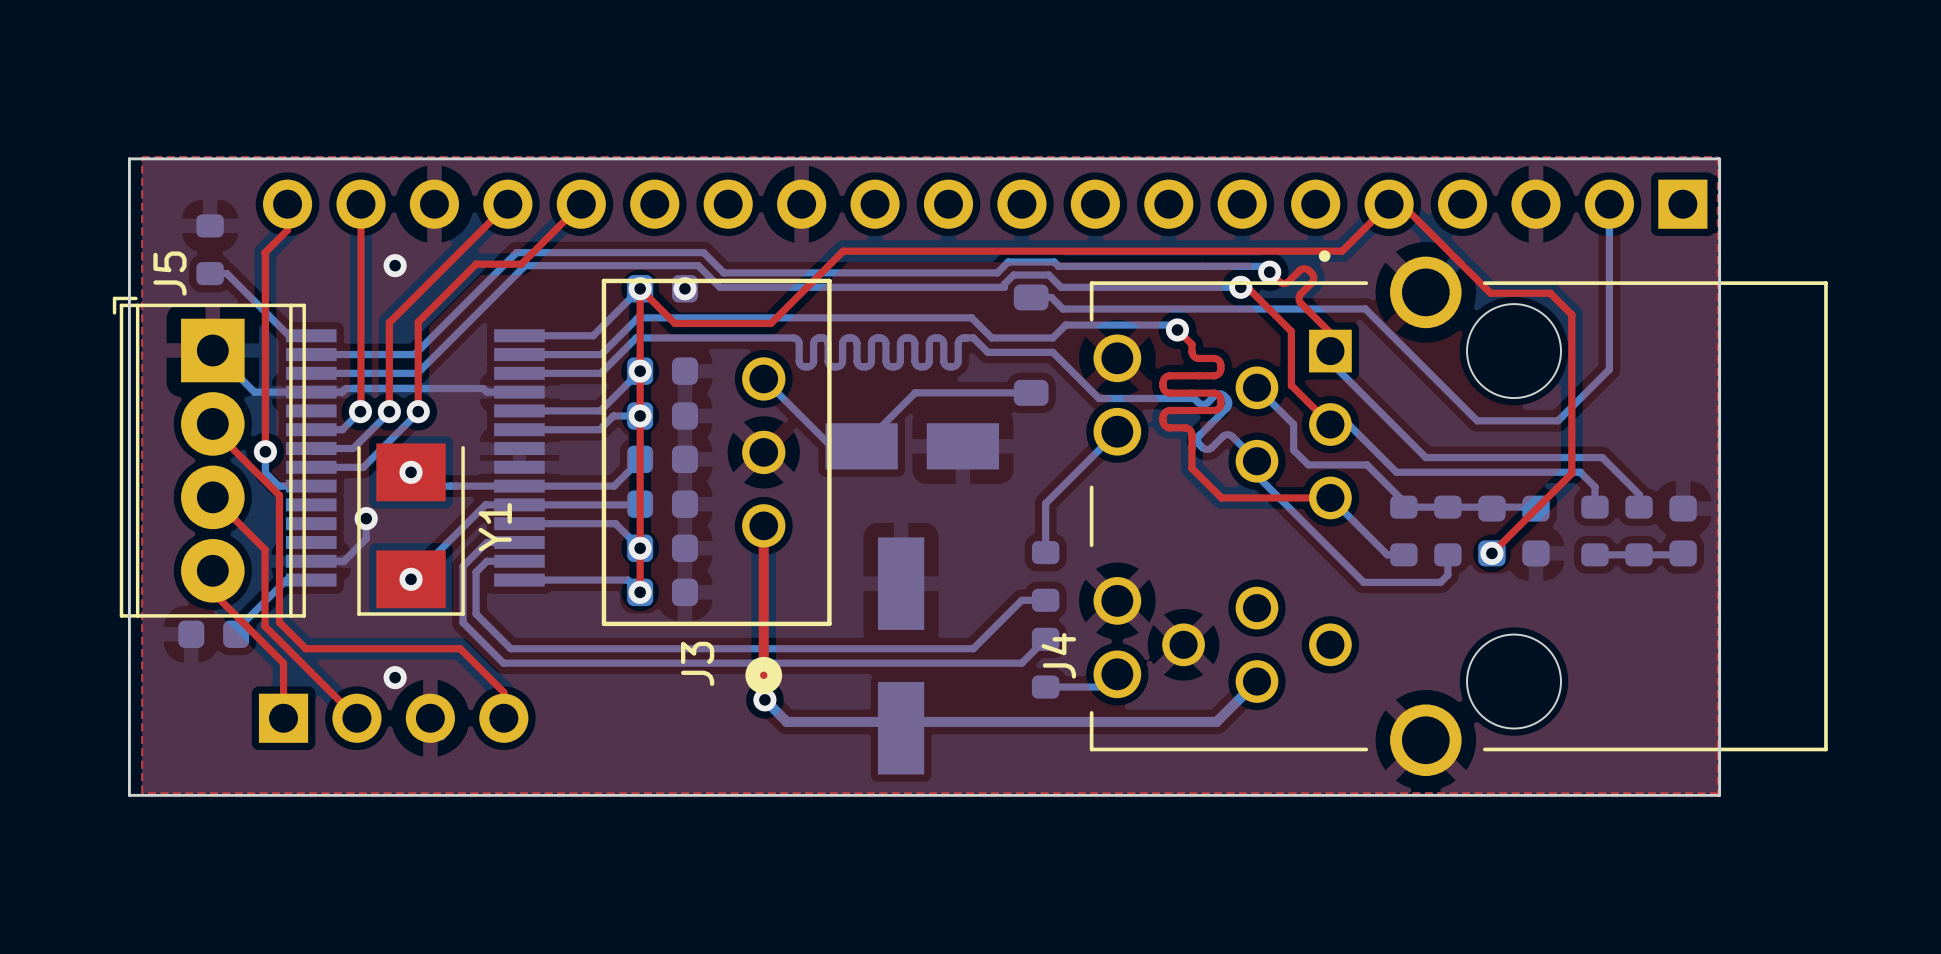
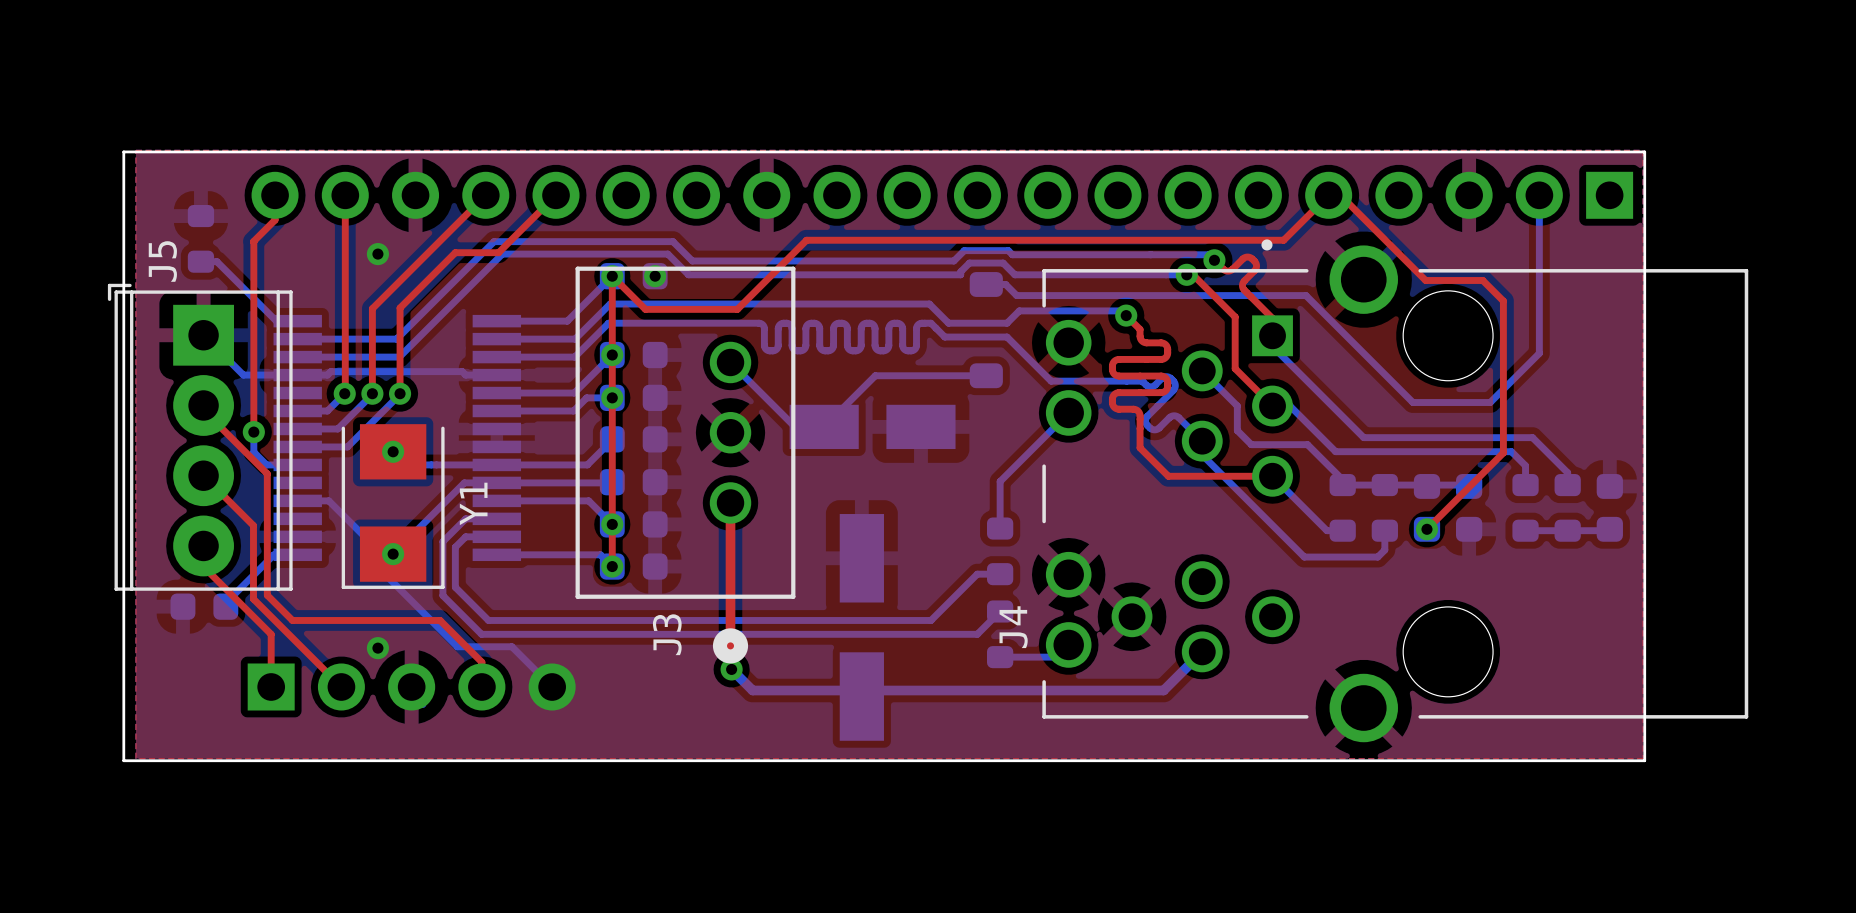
bottom track: (366, 518) (366, 538) (343, 561) (311, 561) -> none
via: (366, 518) -> none
bottom track: none -> (297, 500) (328, 500) (373, 545) (373, 562) (457, 646) (511, 646) (552, 686)
part: none -> (411, 686)

